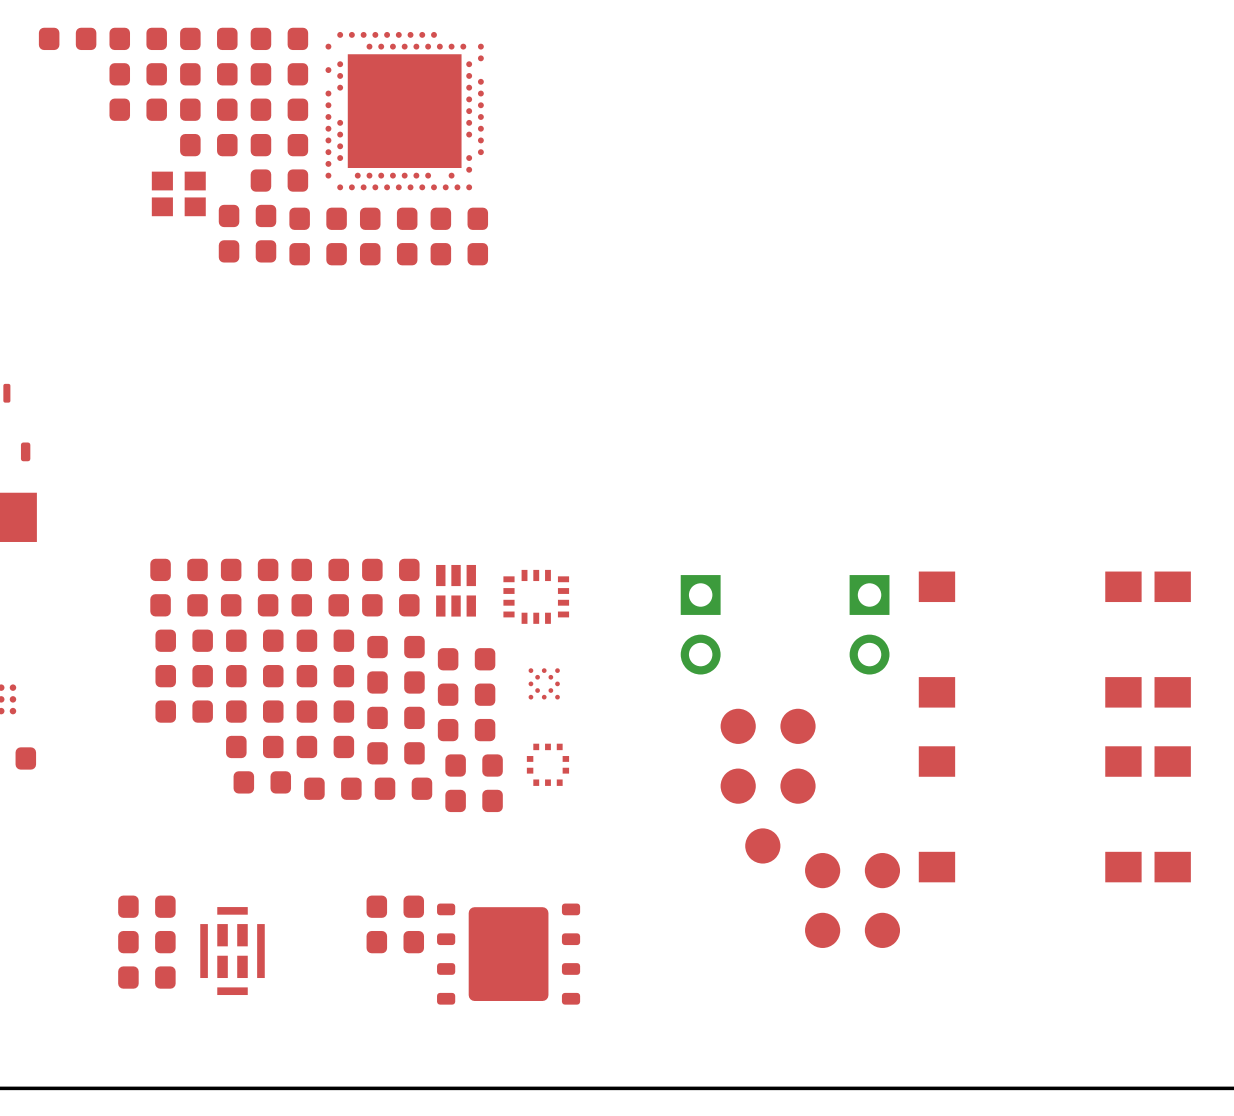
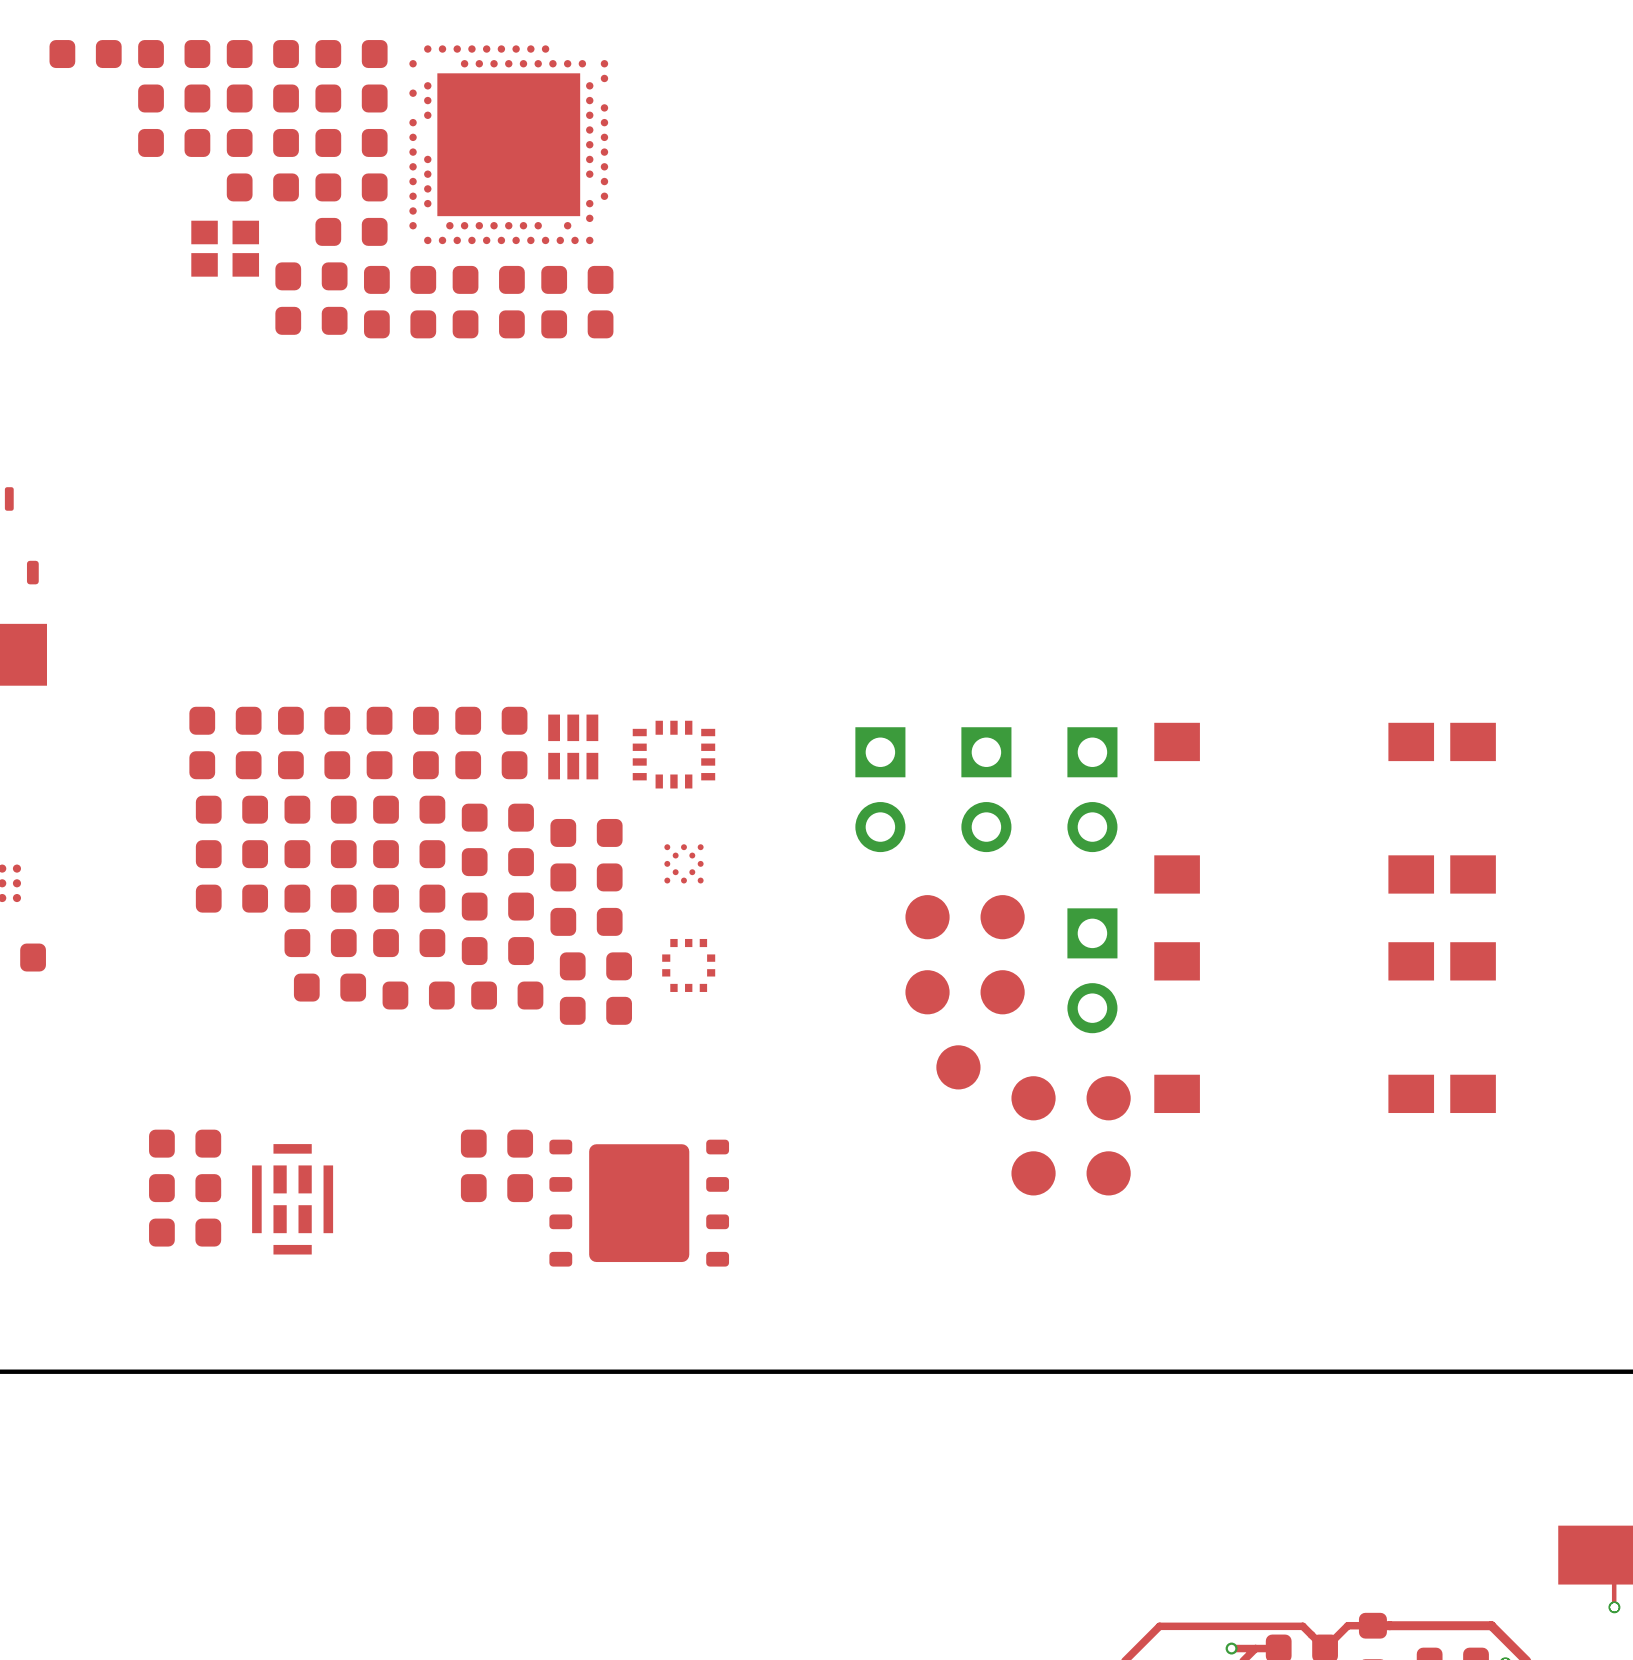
part: none -> (986, 789)
part: none -> (1092, 970)

